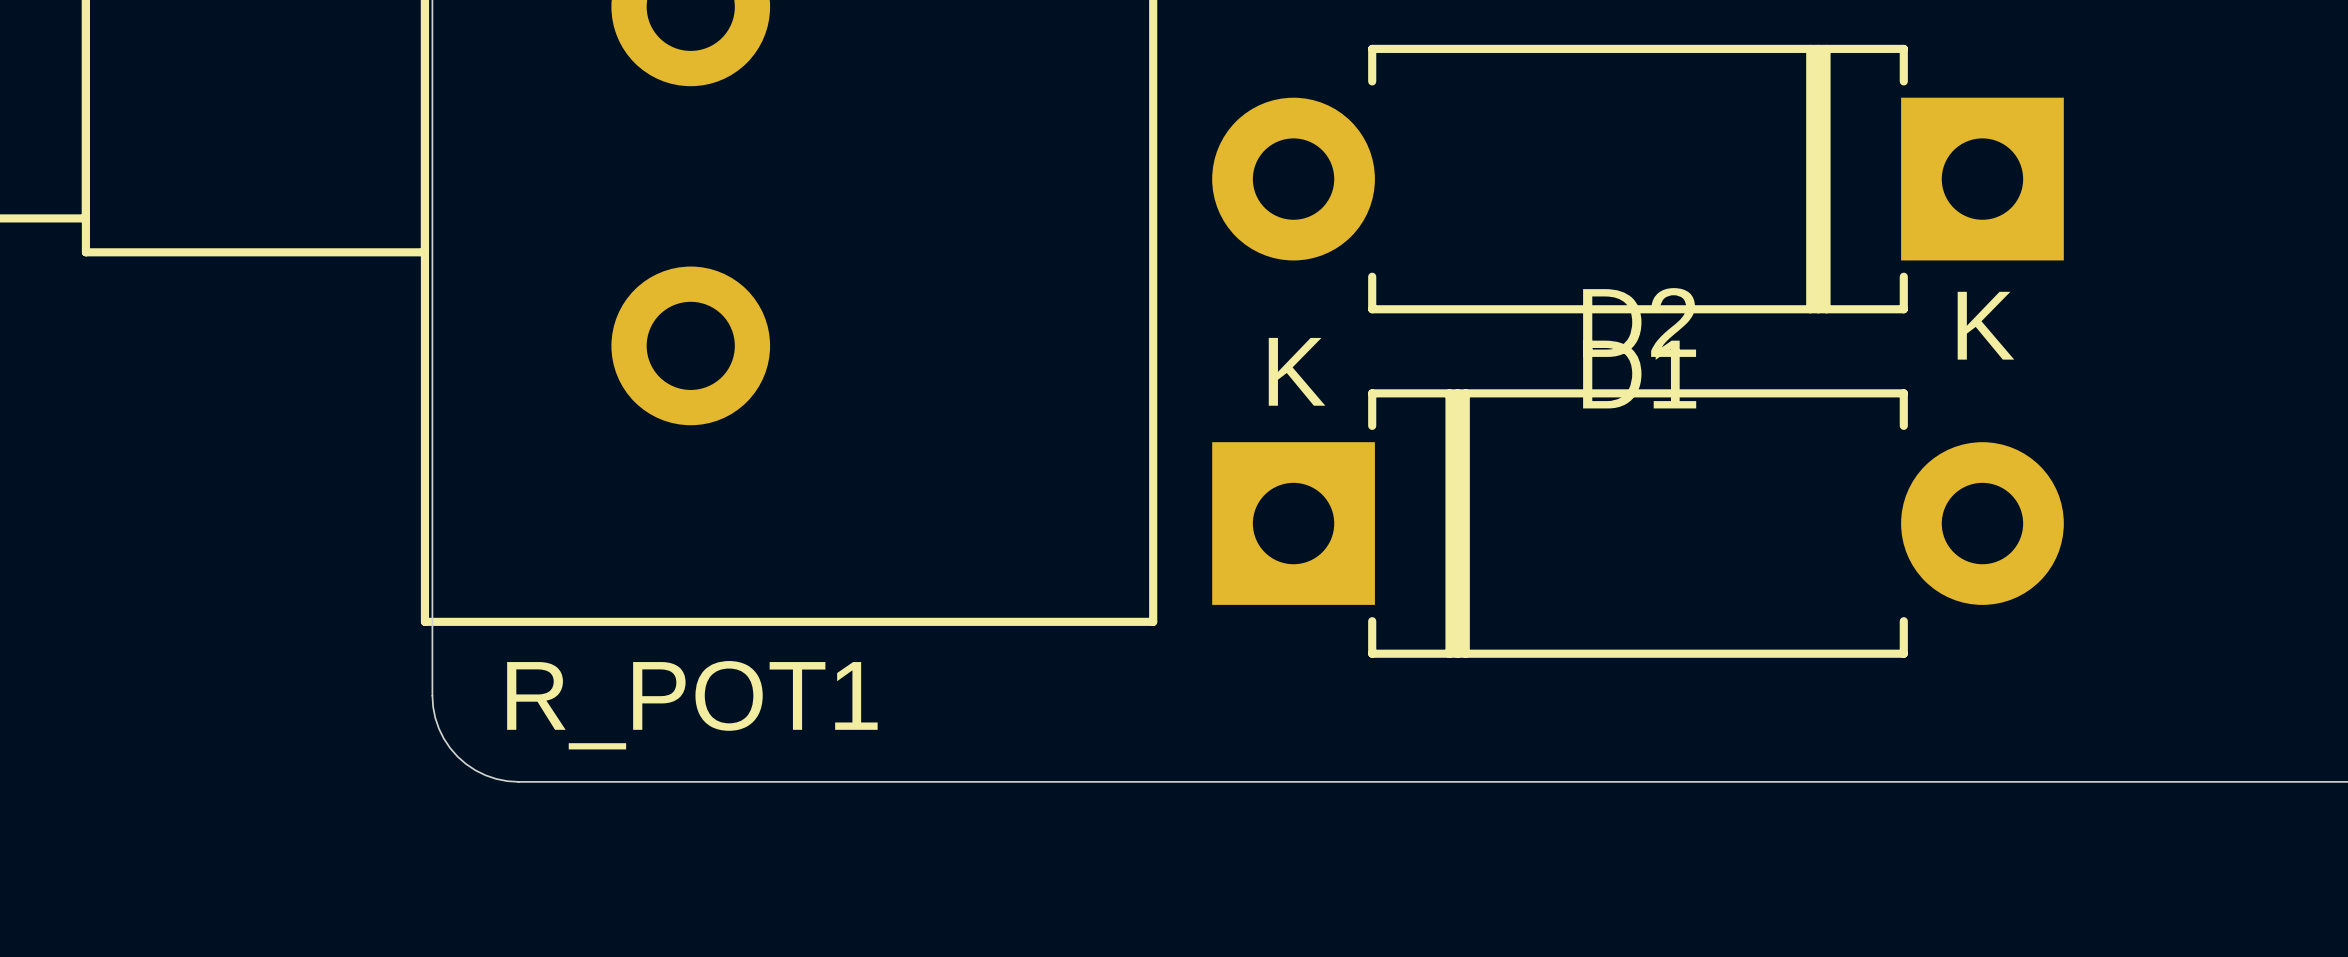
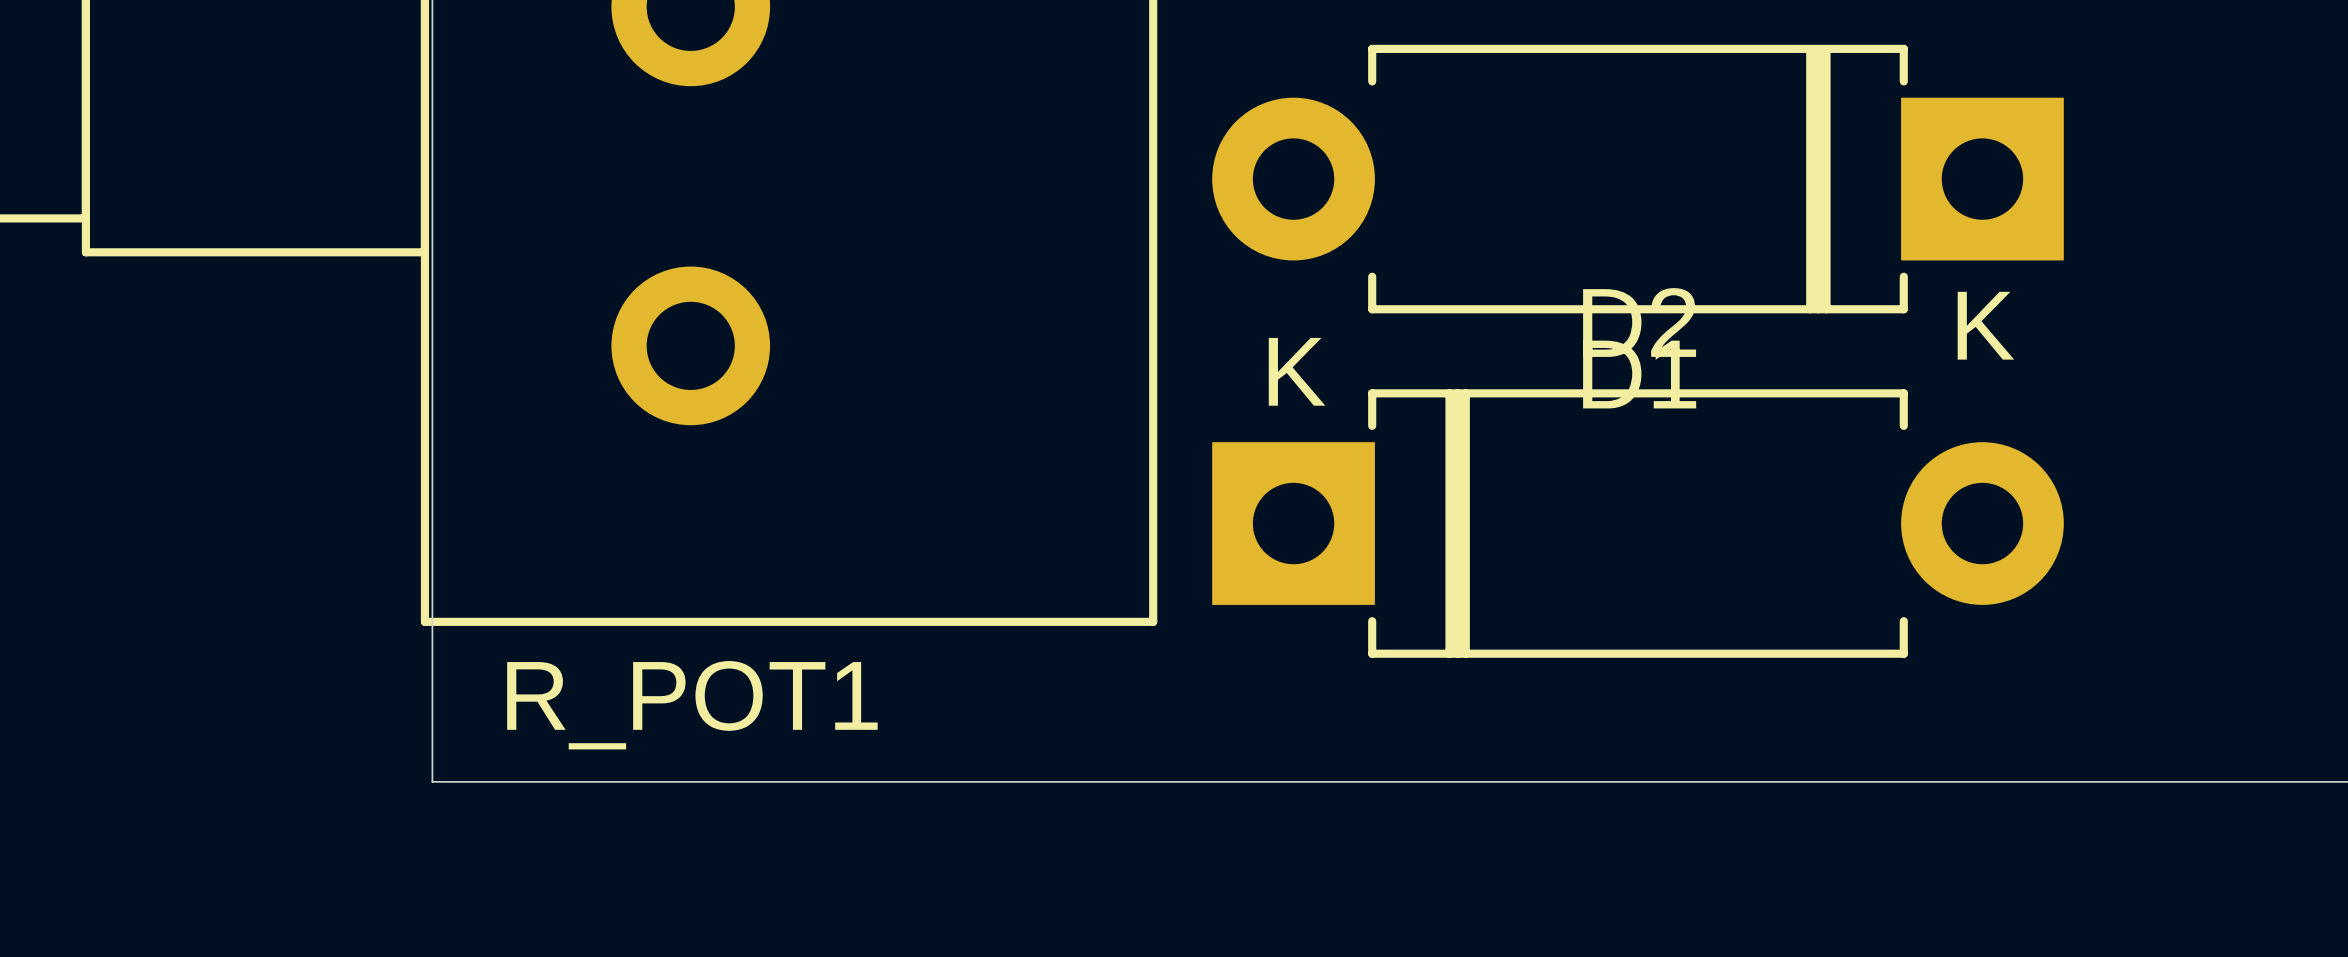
board edge: (432, 695) (438, 728) (457, 756) (485, 775) (518, 781) -> (432, 695) (432, 781) (518, 781)

